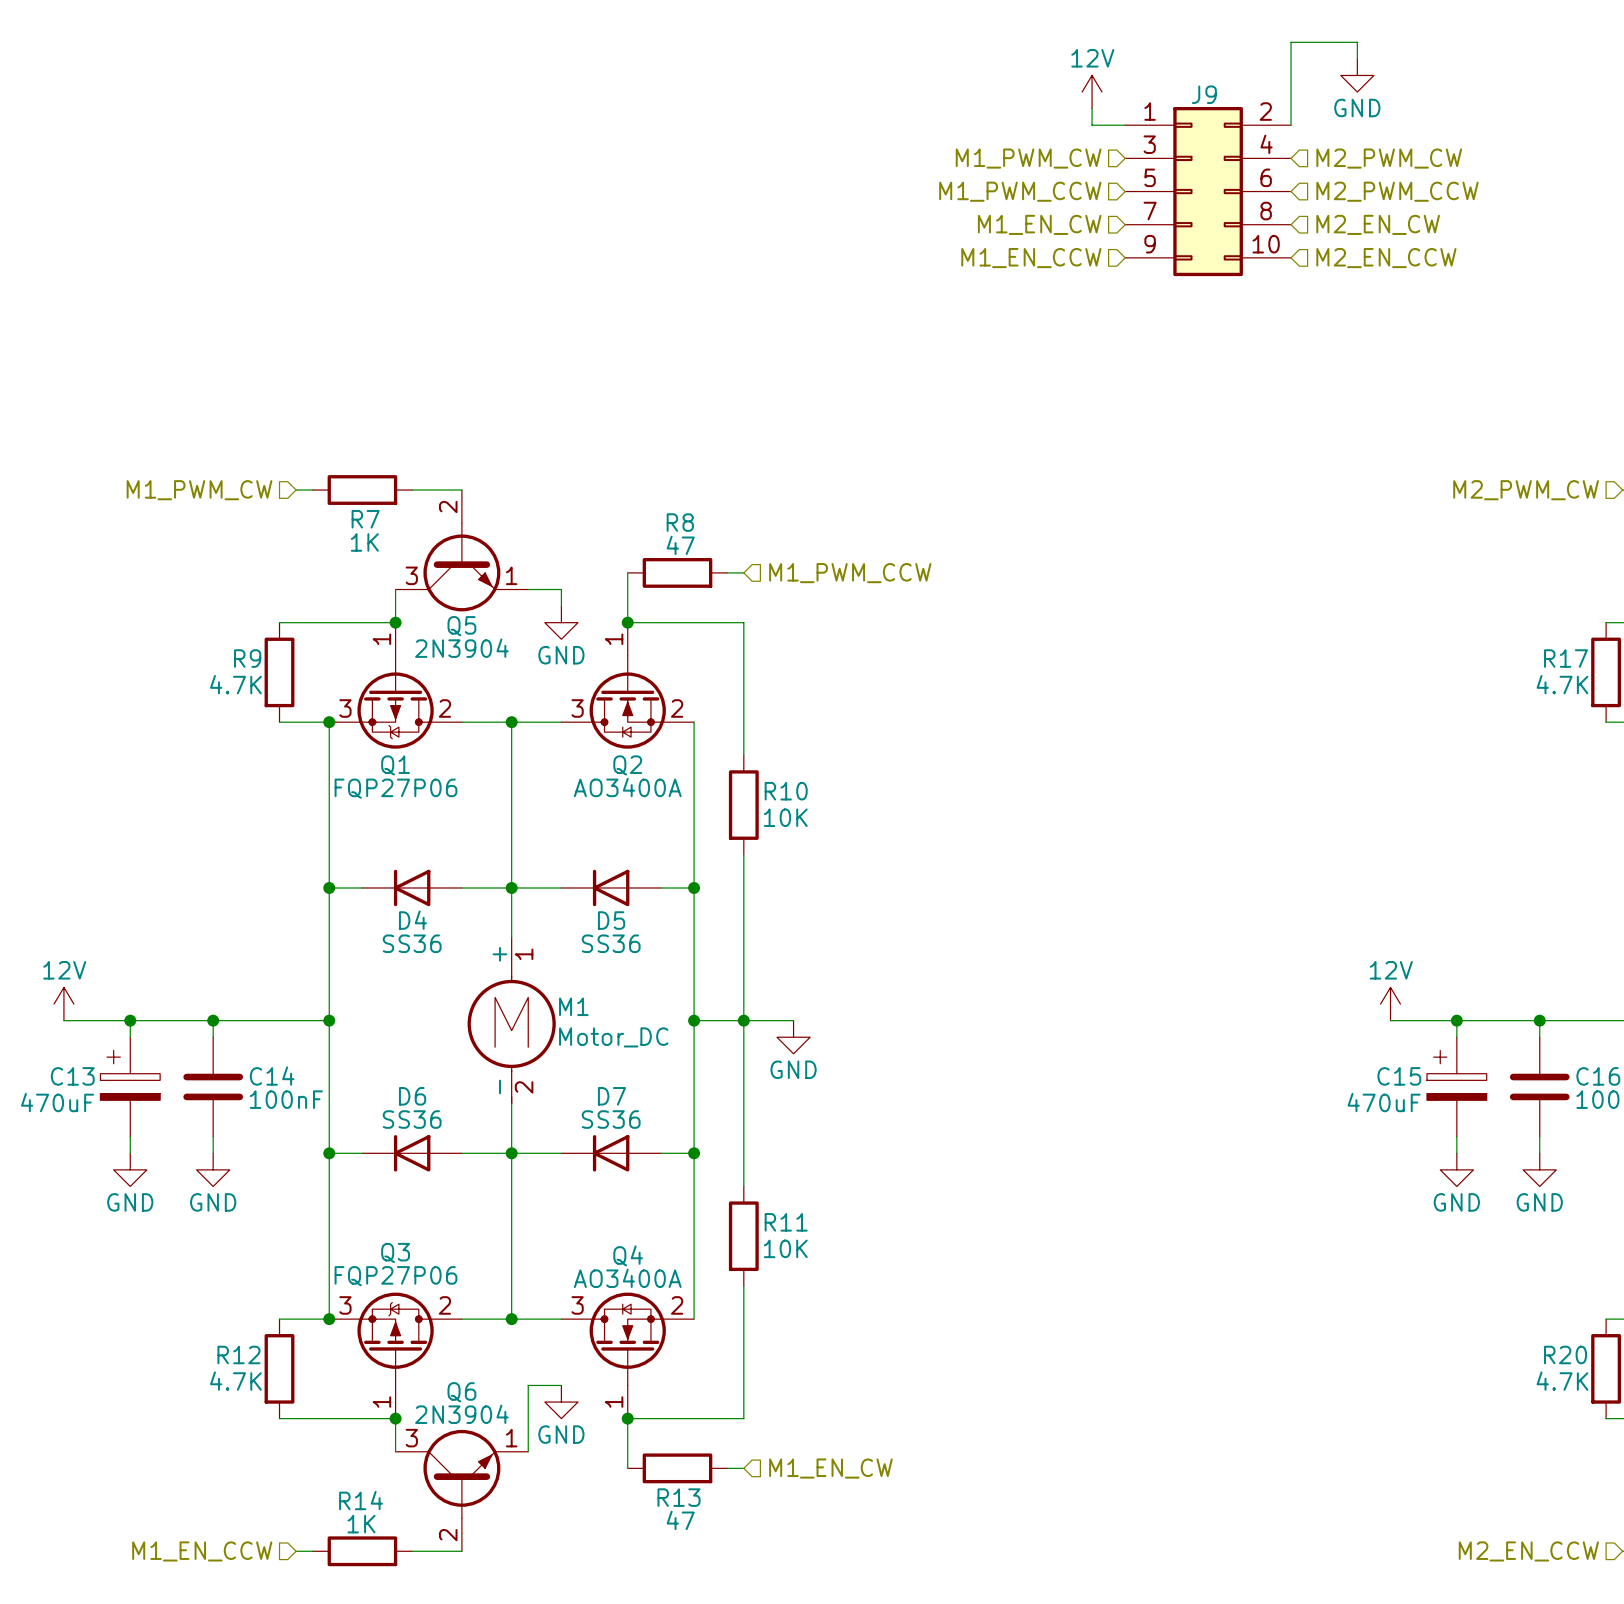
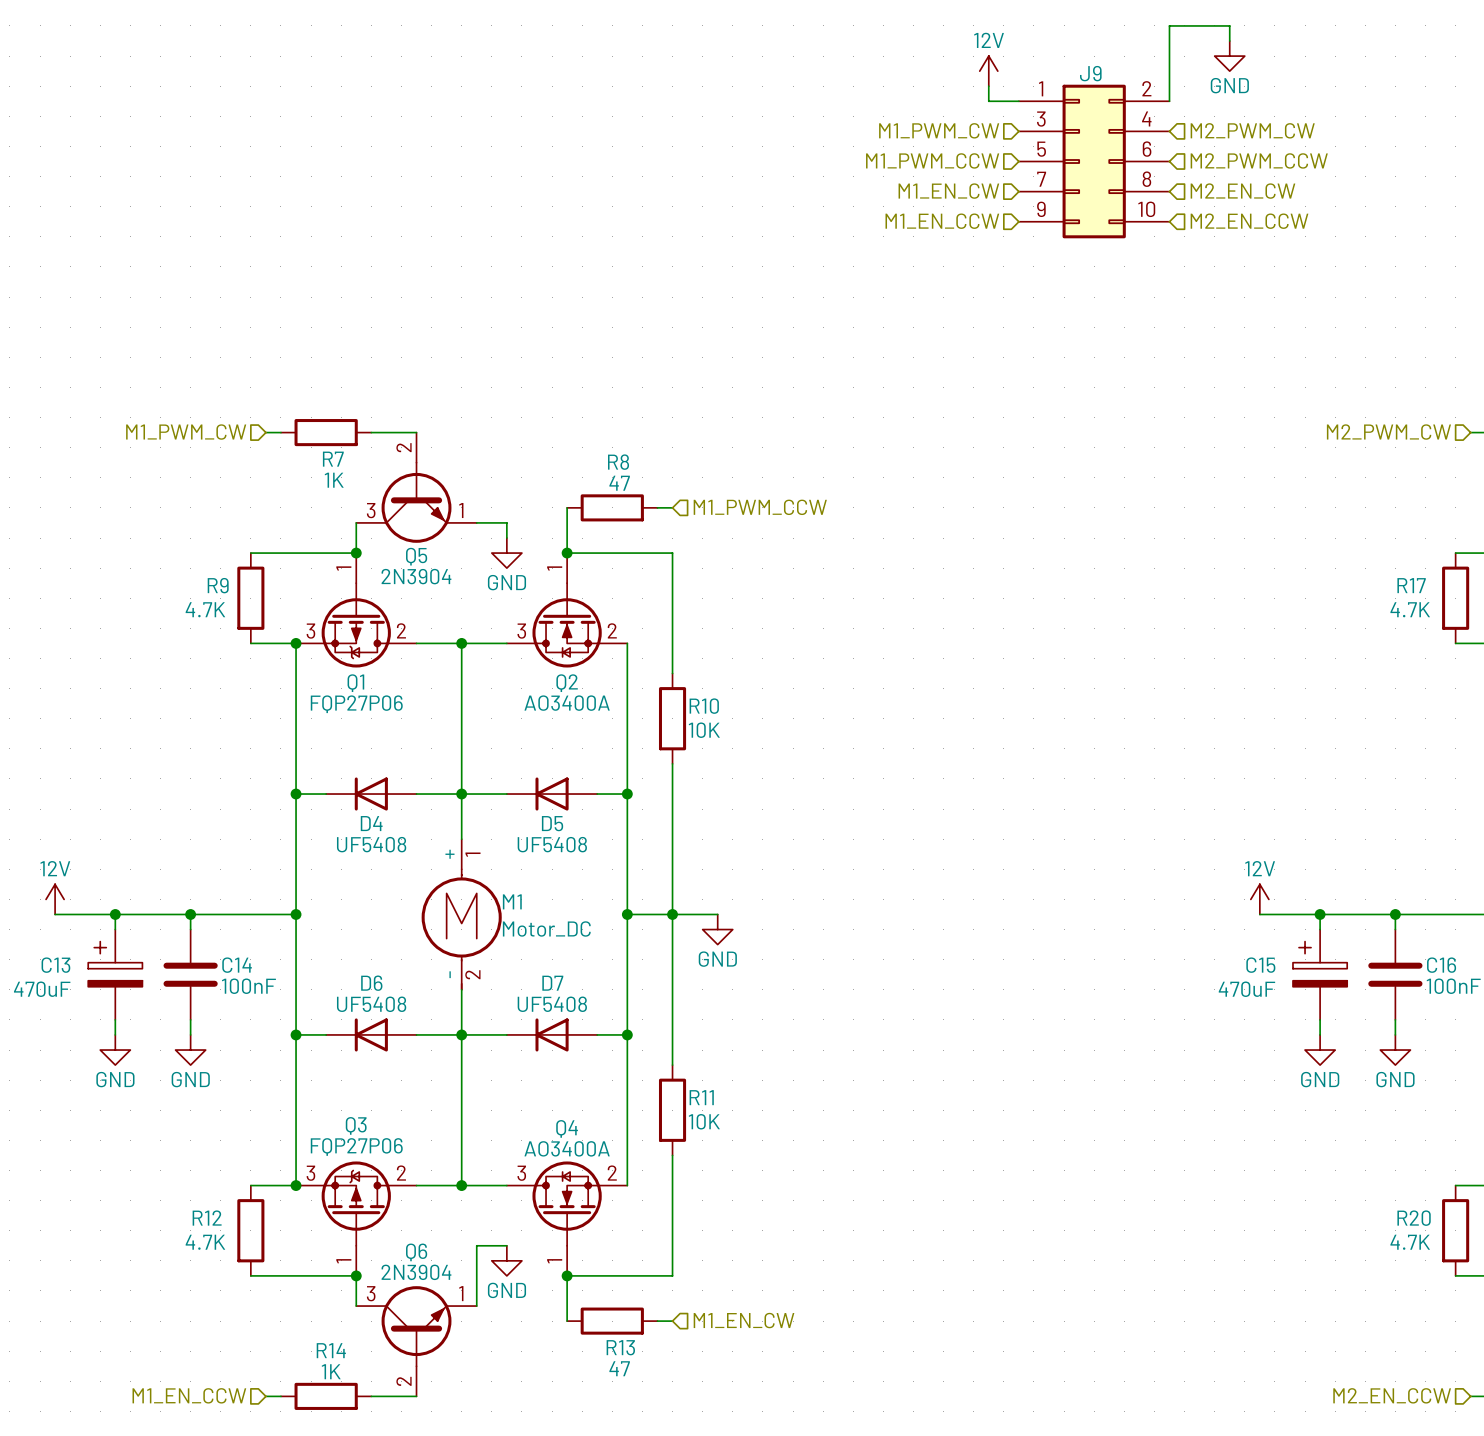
D4 value: SS36 (412, 943) -> UF5408 (371, 844)
D5 value: SS36 (611, 943) -> UF5408 (552, 844)
D6 value: SS36 (412, 1119) -> UF5408 (371, 1004)
D7 value: SS36 (611, 1119) -> UF5408 (552, 1004)

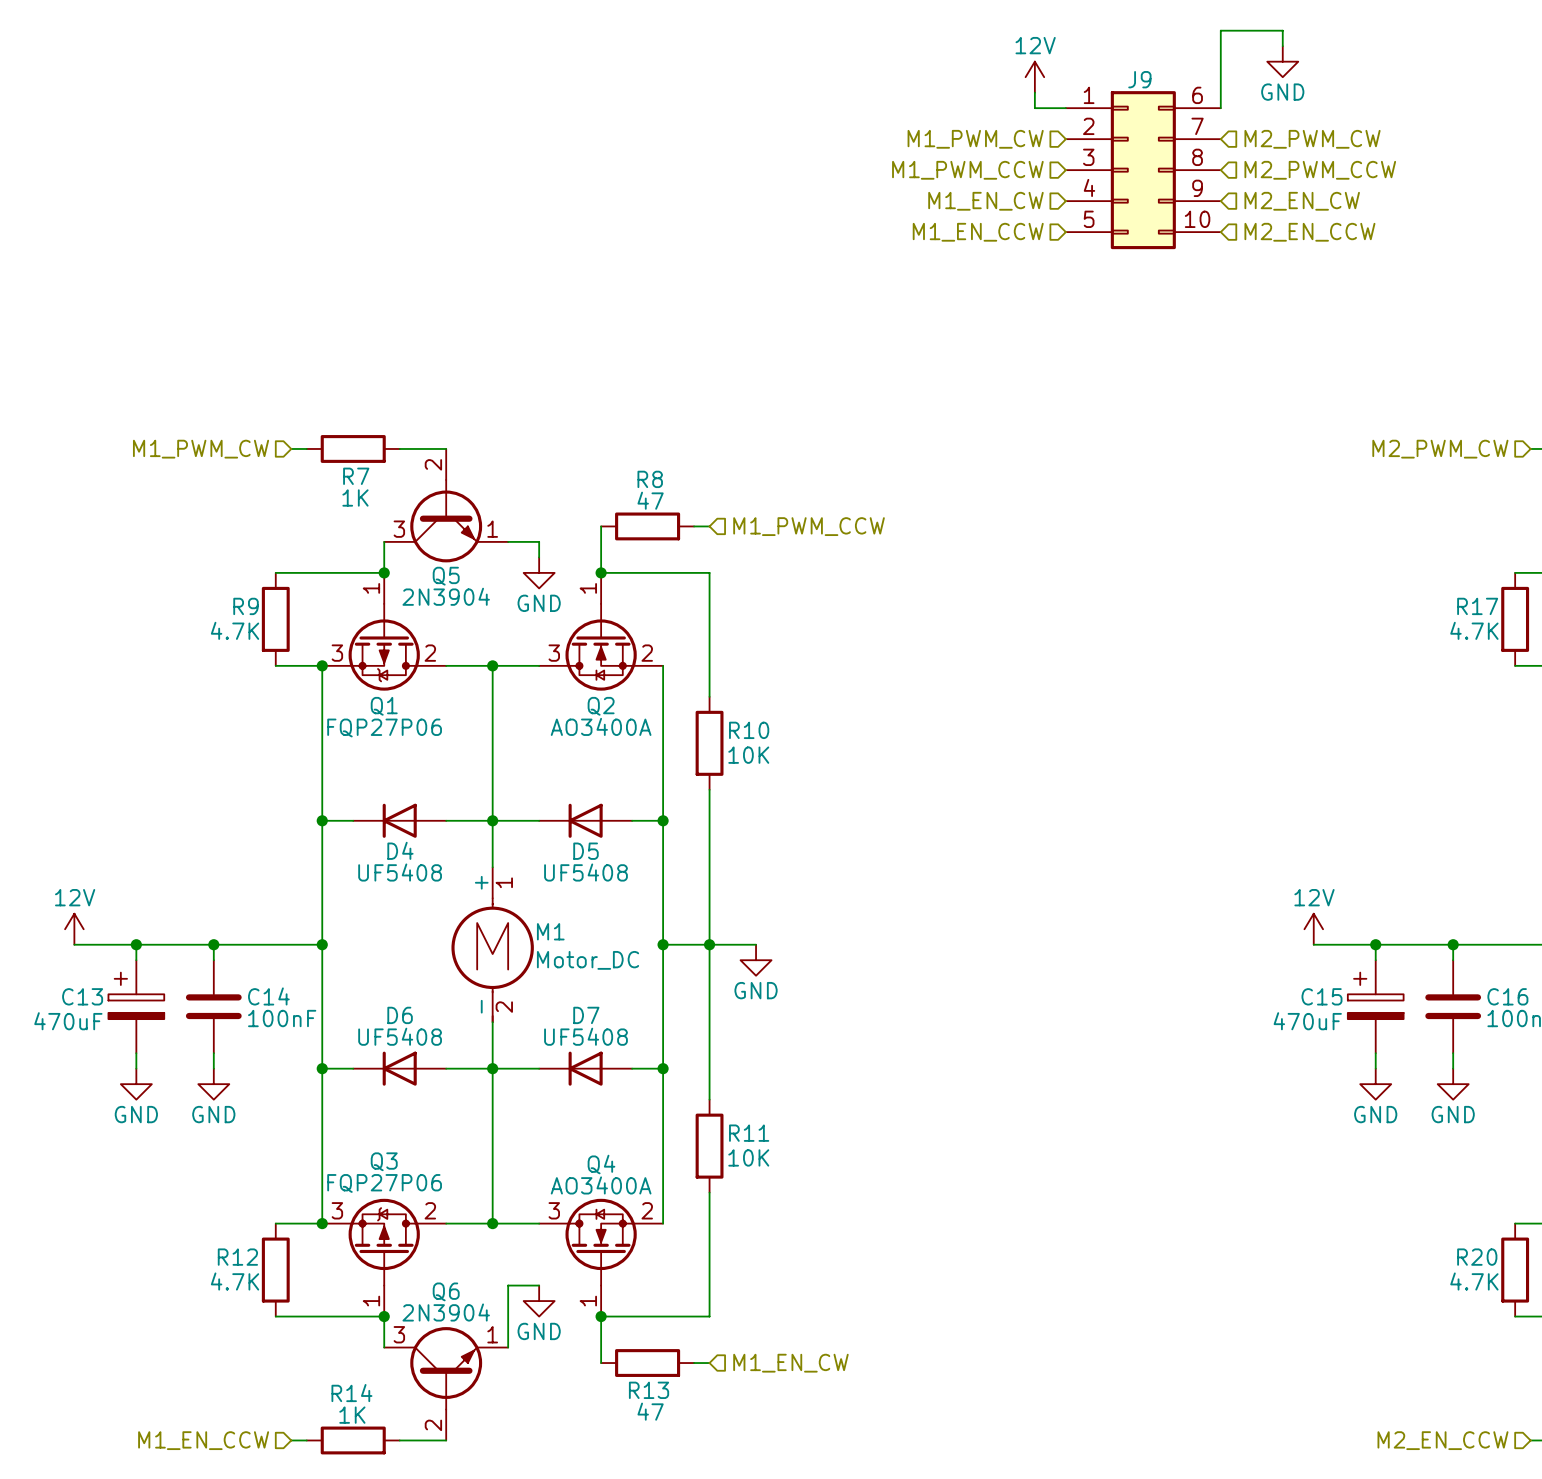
J9 pin number: 2 (1146, 88) -> 6 (1197, 95)
J9 pin number: 4 (1146, 118) -> 7 (1197, 126)
J9 pin number: 3 (1041, 119) -> 2 (1088, 126)
J9 pin number: 5 (1041, 149) -> 3 (1088, 157)
J9 pin number: 6 (1147, 149) -> 8 (1197, 157)
J9 pin number: 7 (1041, 179) -> 4 (1089, 187)
J9 pin number: 8 (1146, 179) -> 9 (1197, 188)
J9 pin number: 9 (1041, 209) -> 5 (1089, 219)

